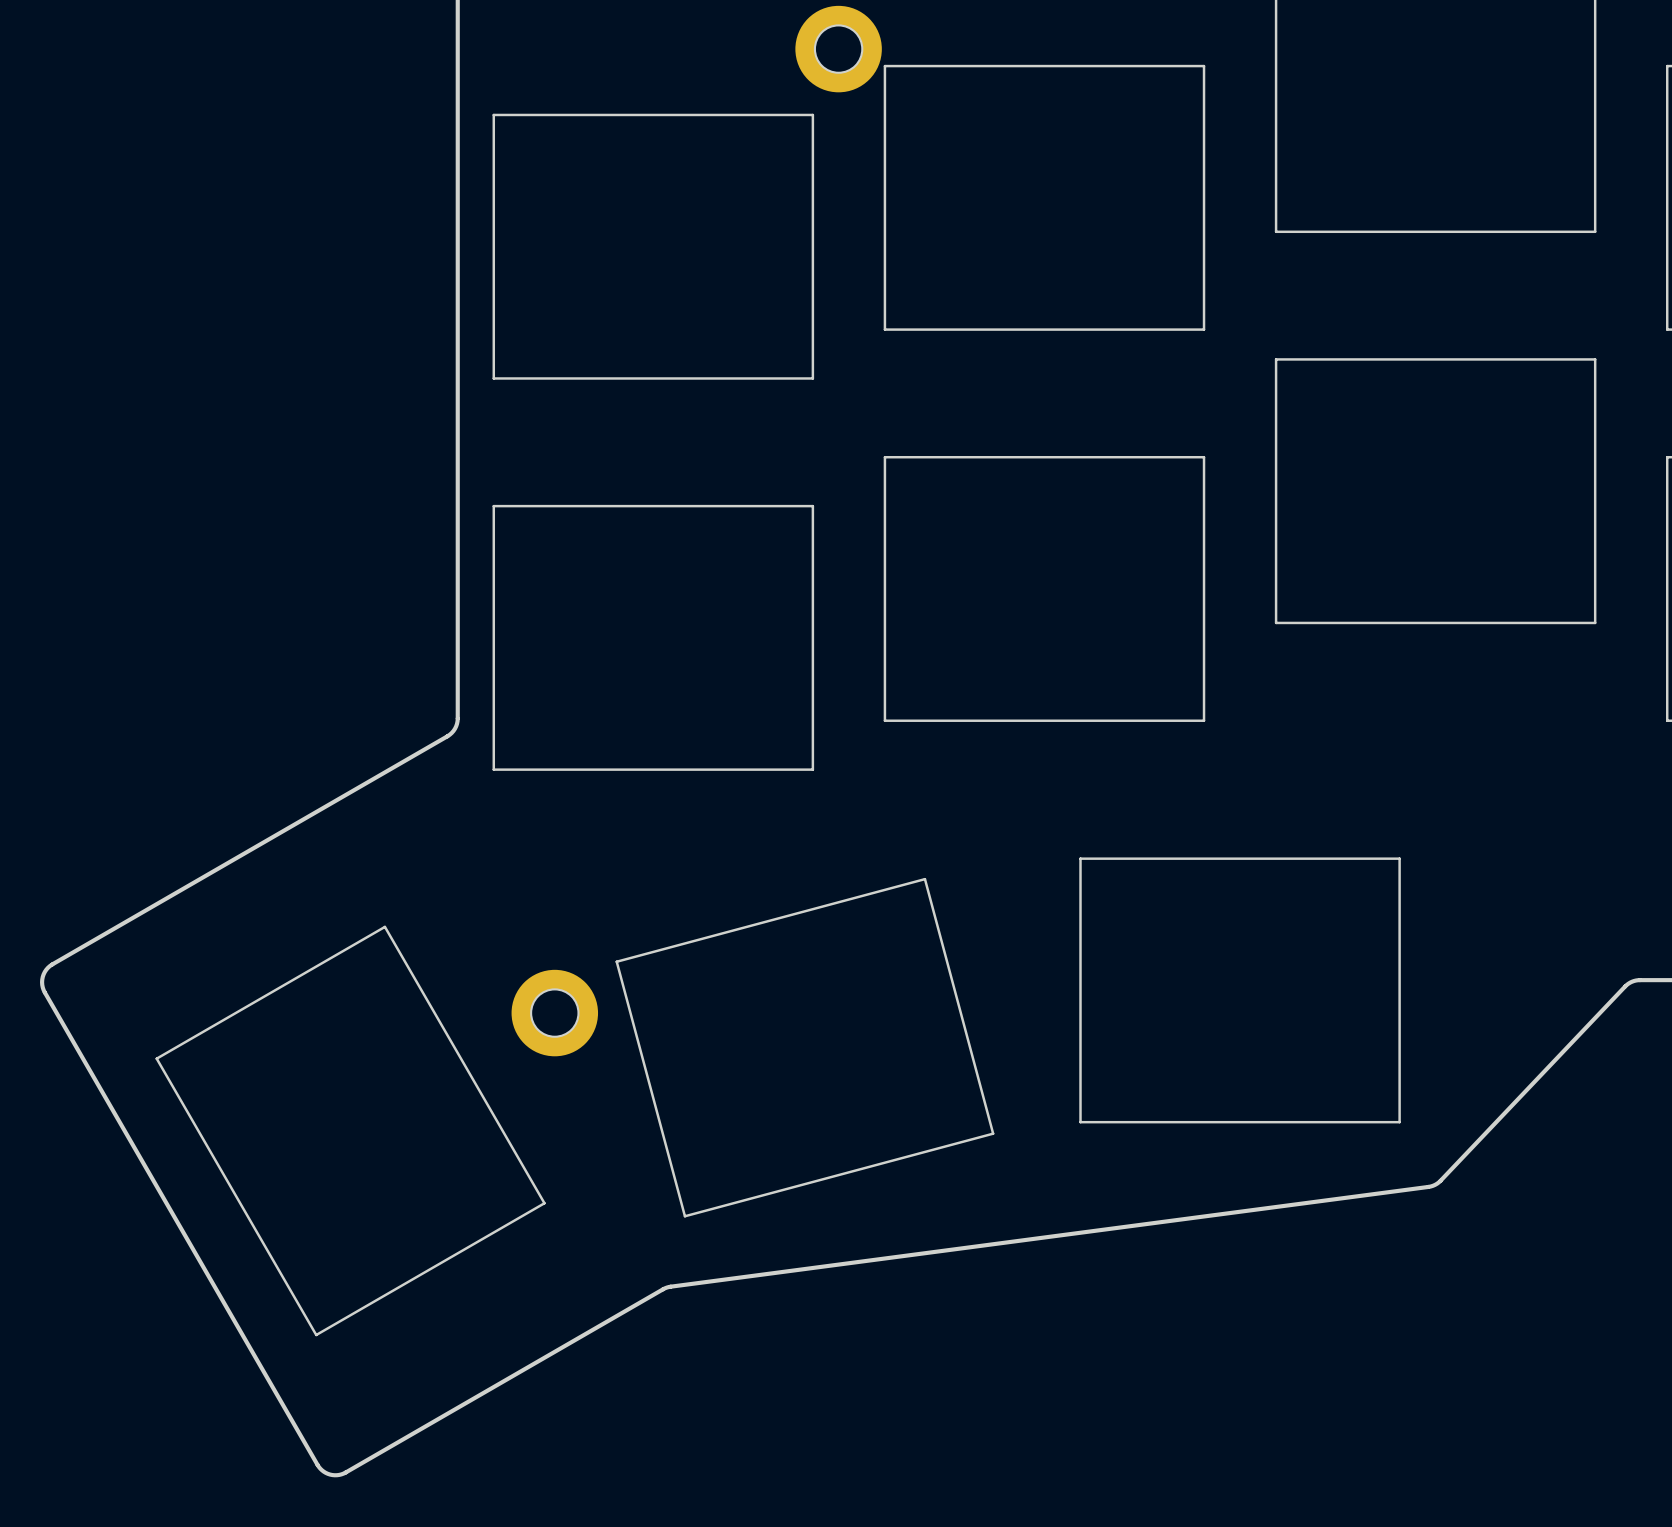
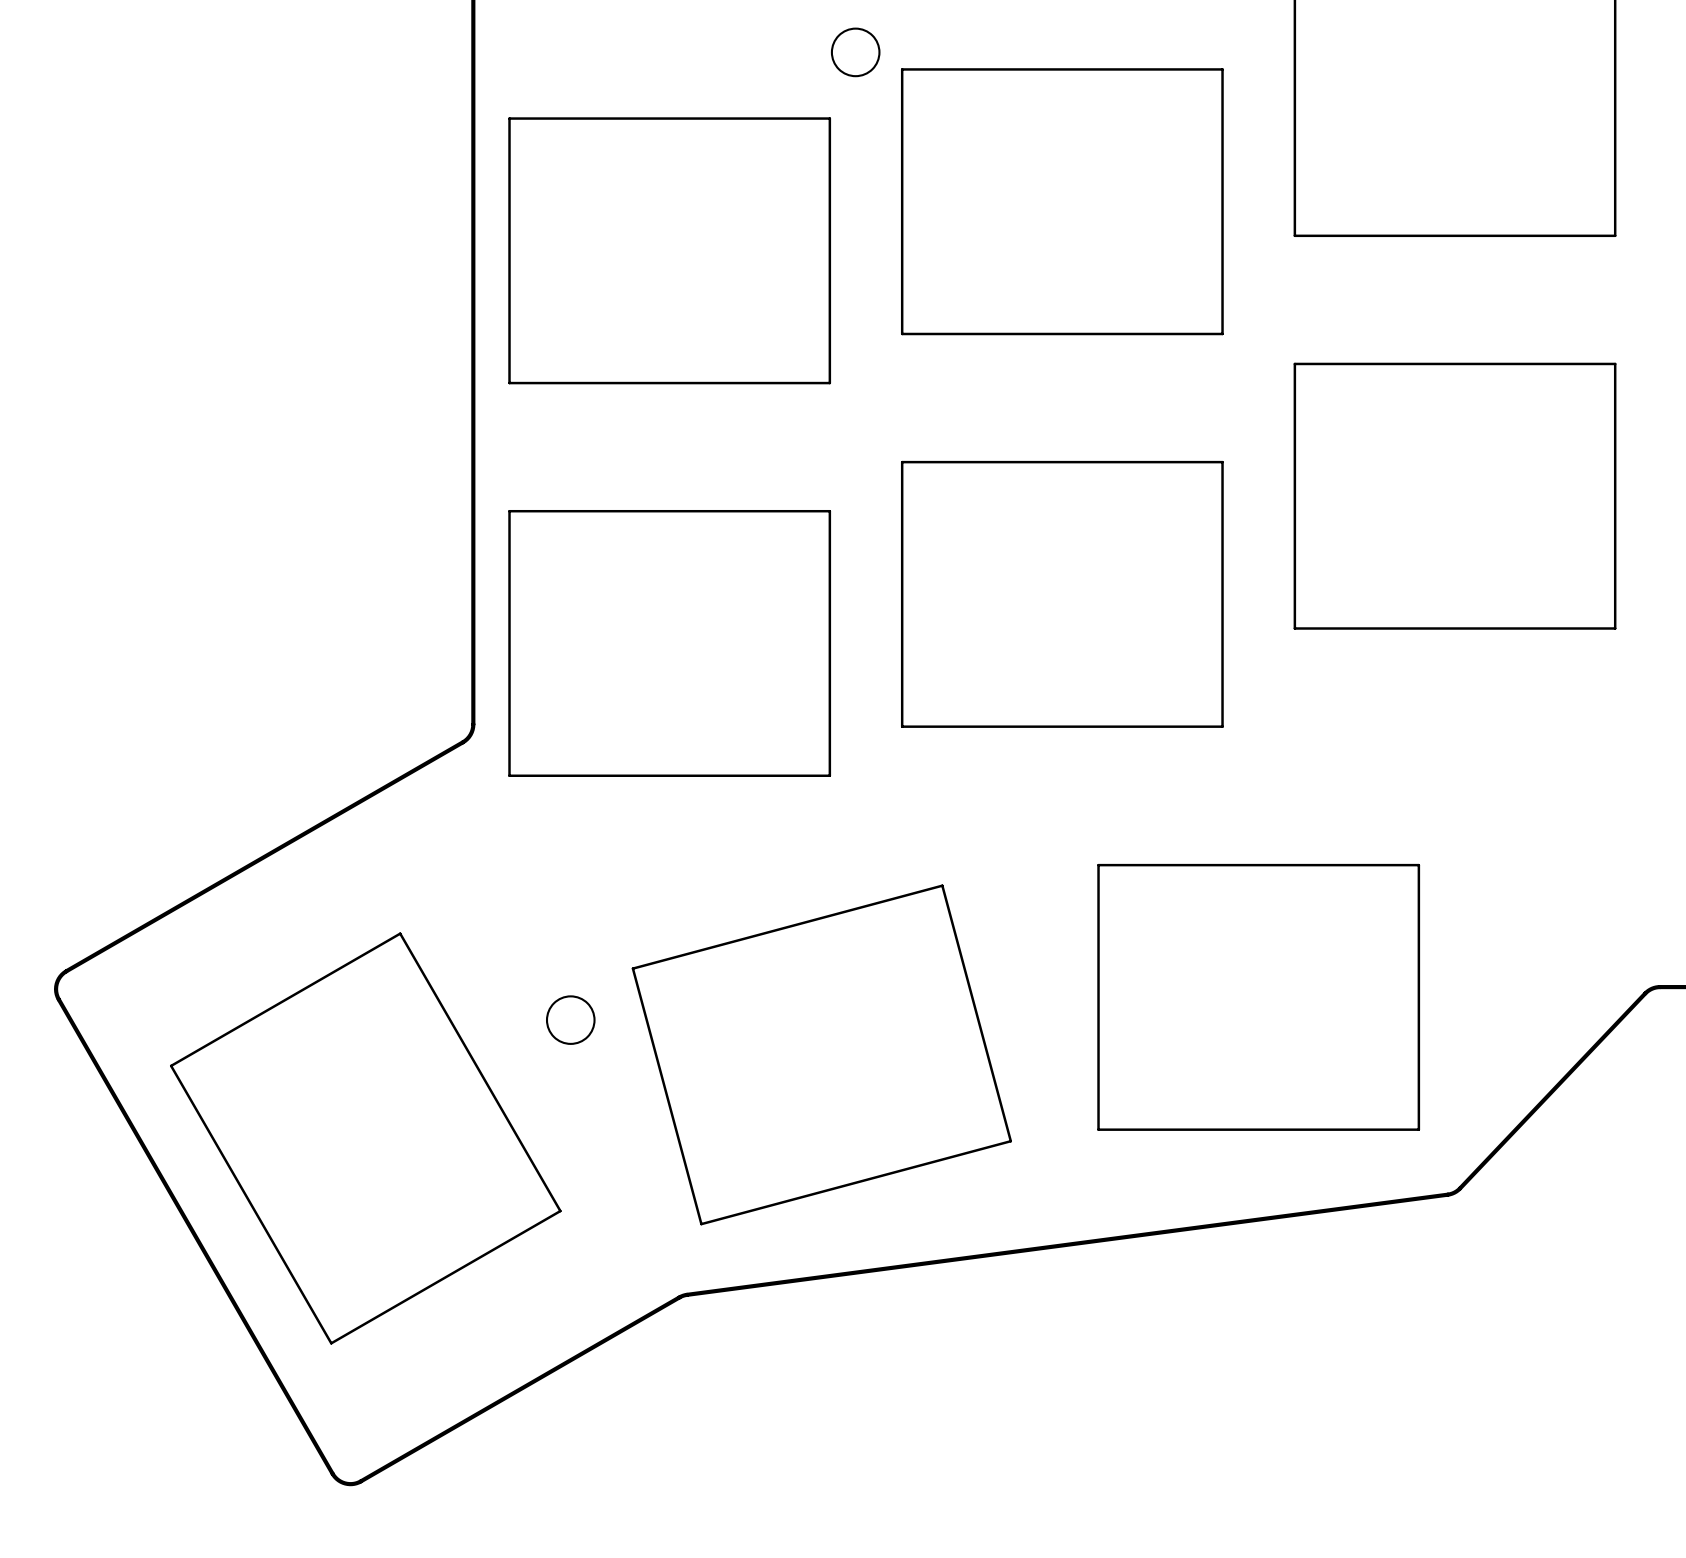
drawing: none -> [830, 27, 881, 78]
part: (838, 49) -> none
drawing: none -> [545, 995, 596, 1045]
part: (554, 1013) -> none

